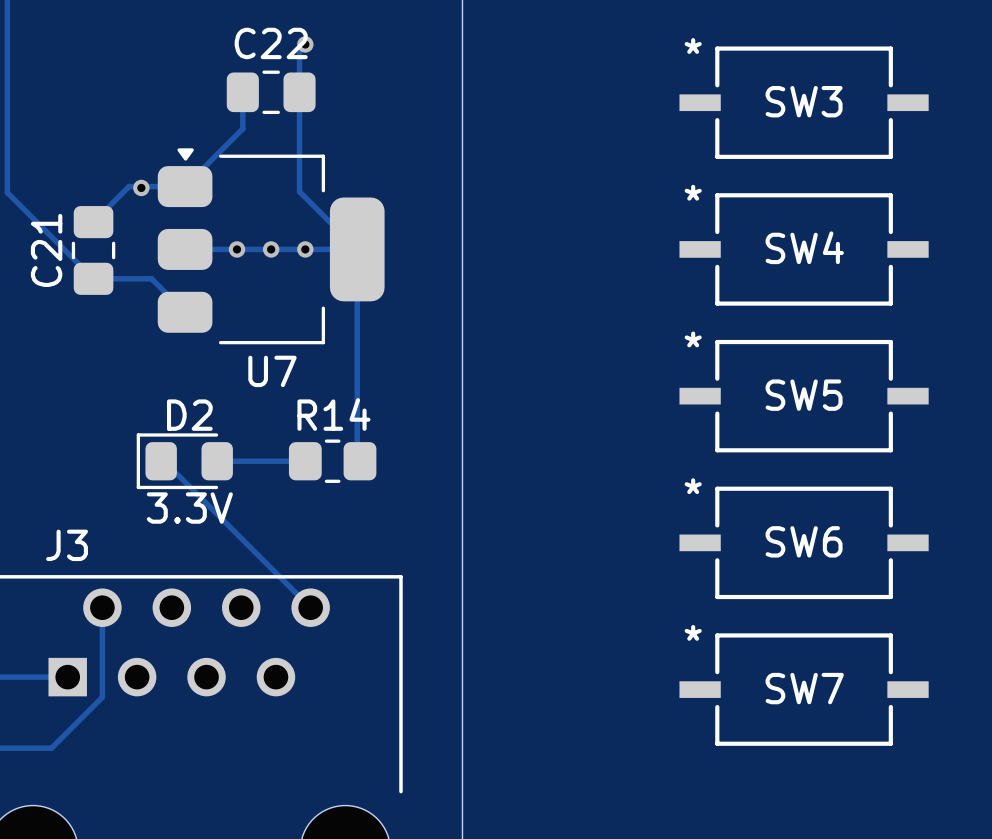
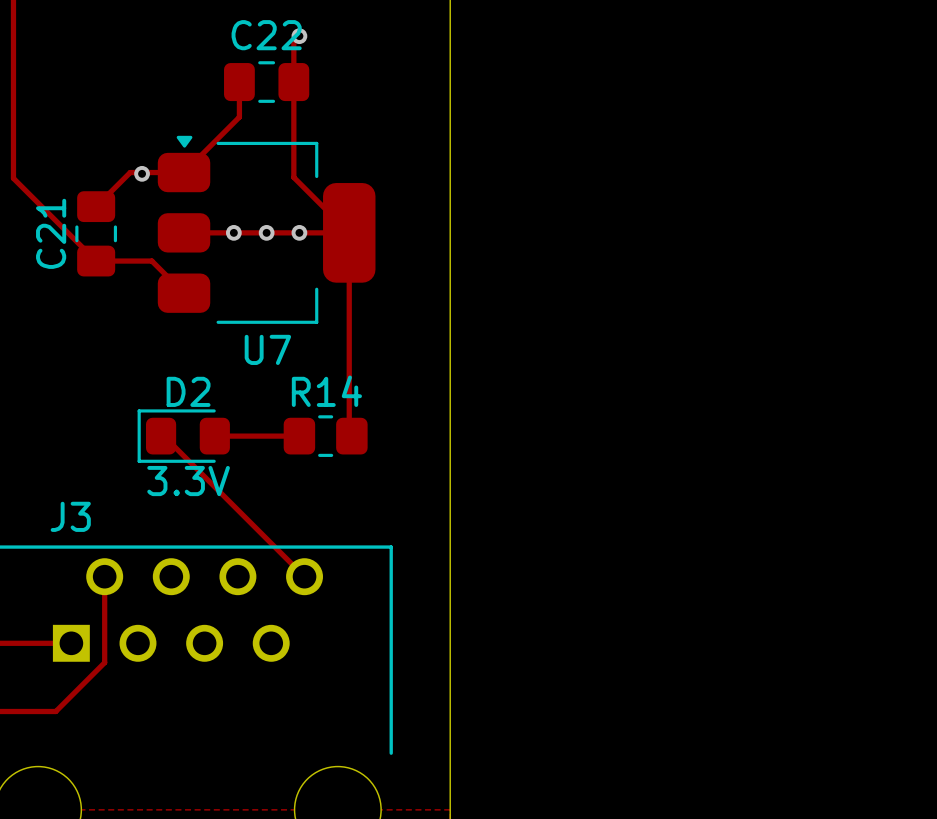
SW3: (804, 102) -> none
SW4: (804, 249) -> none
SW5: (804, 396) -> none
SW6: (804, 542) -> none
SW7: (804, 689) -> none

